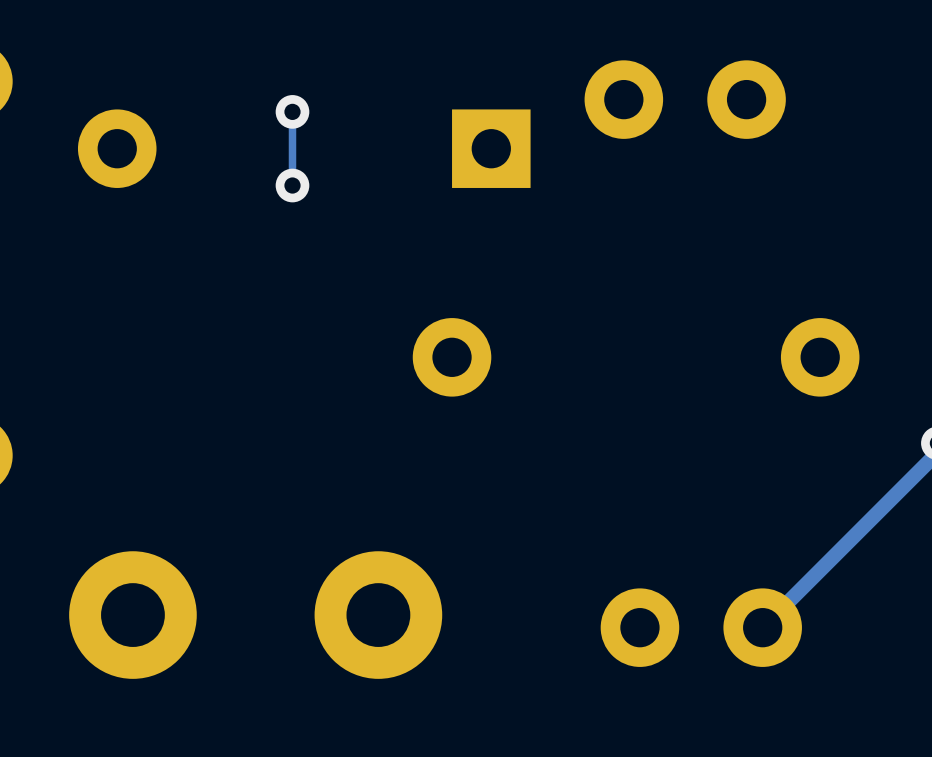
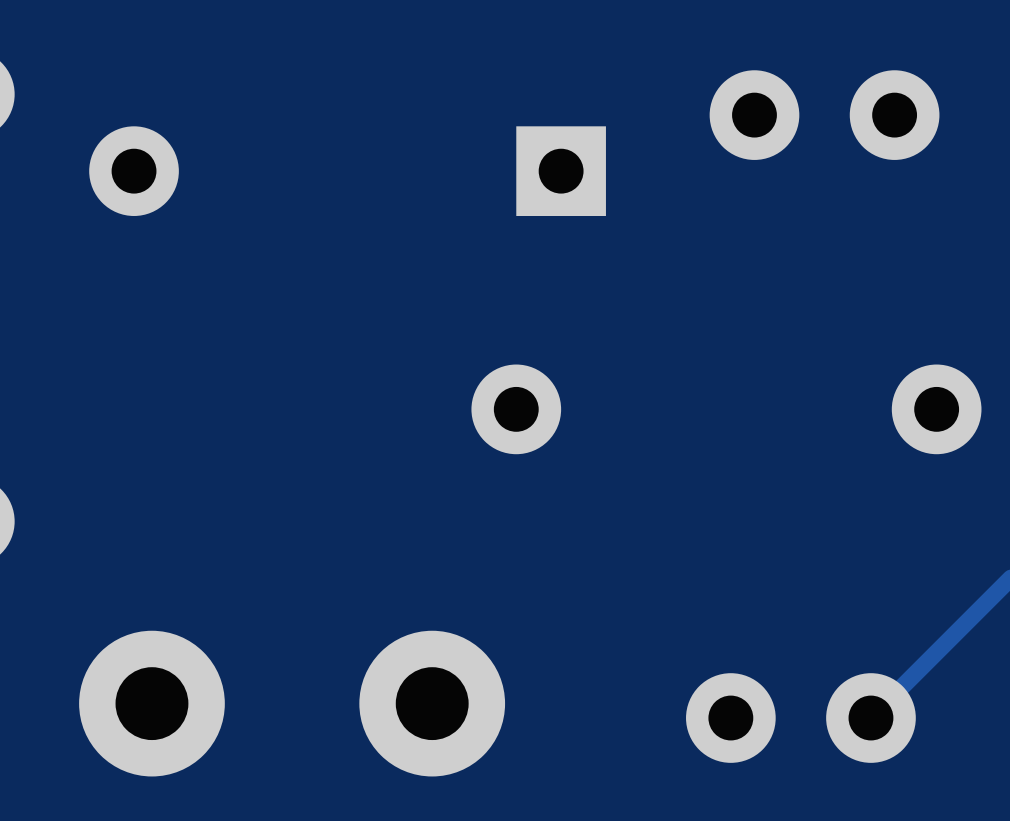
part position: (685, 99) -> (824, 115)
track: (292, 111) (292, 185) -> none
via: (292, 111) -> none
via: (292, 185) -> none

